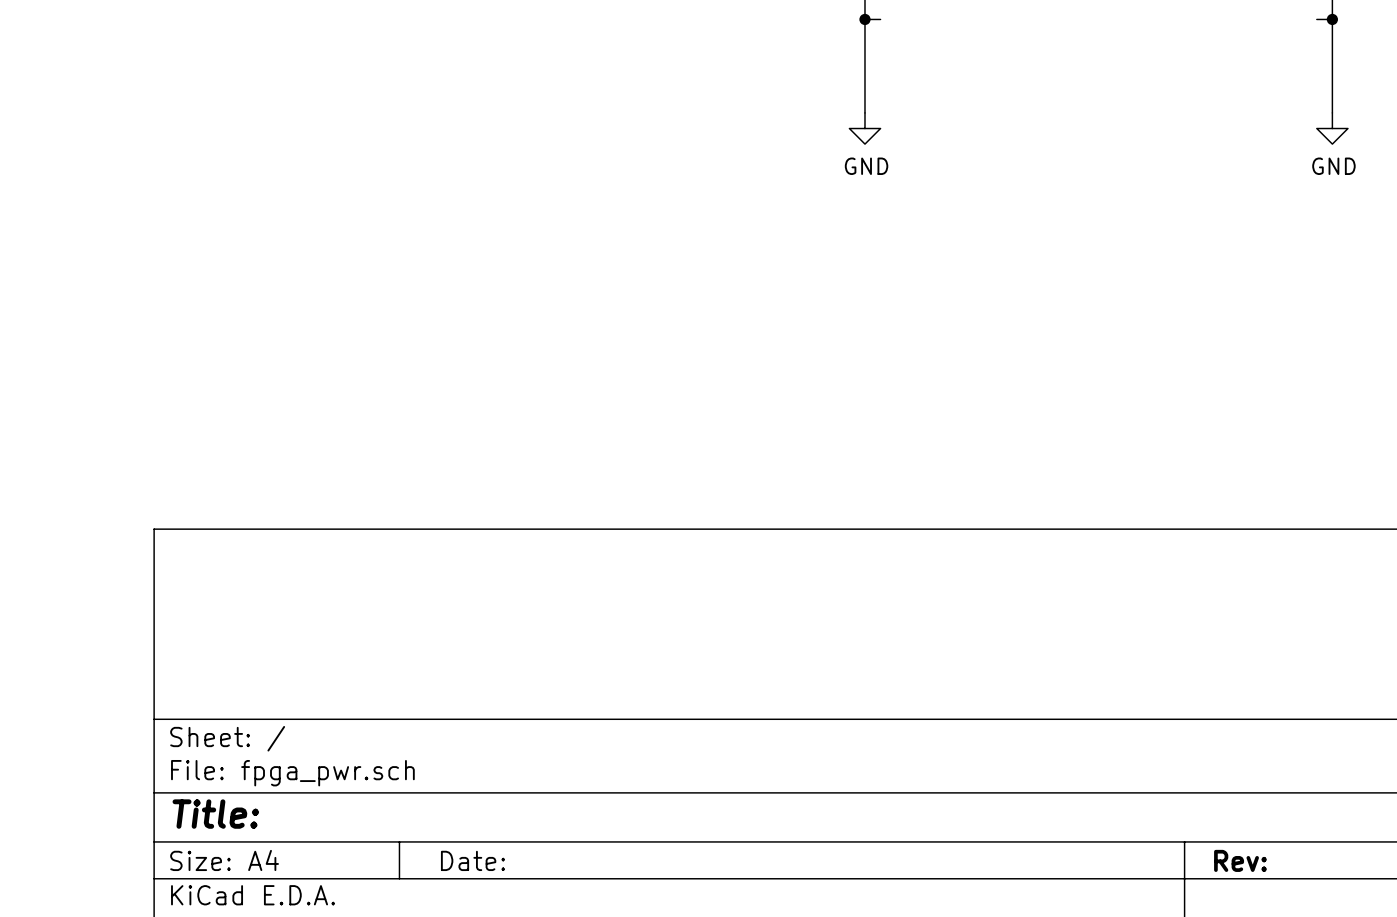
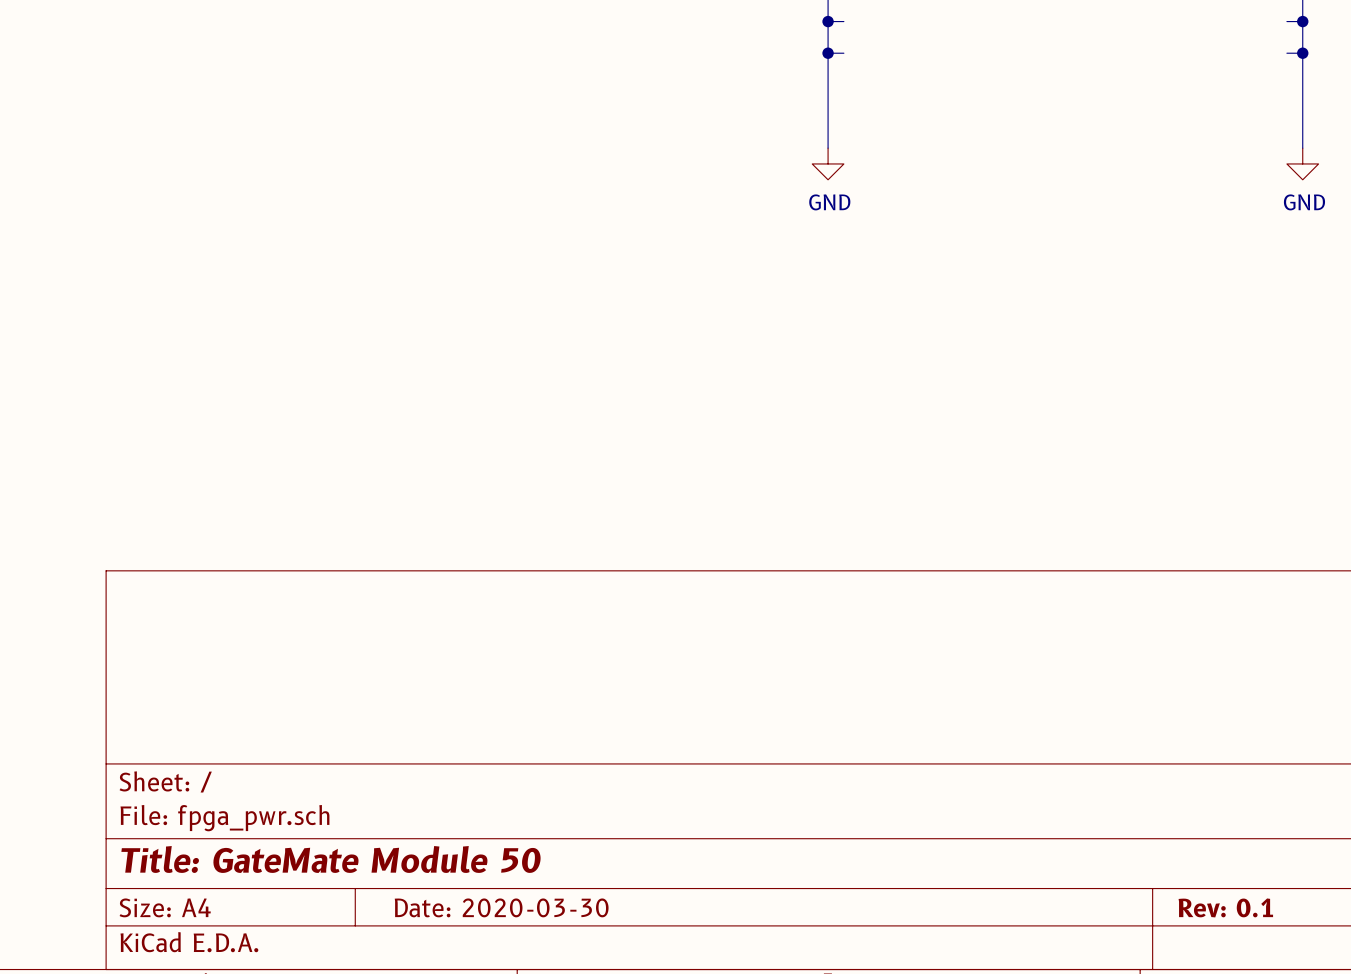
title block: Title: (215, 814) -> Title: GateMate Module 50 (331, 859)
title block: Date: (472, 860) -> Date: 2020-03-30 (501, 907)
title block: Rev: (1240, 860) -> Rev: 0.1 (1225, 907)

